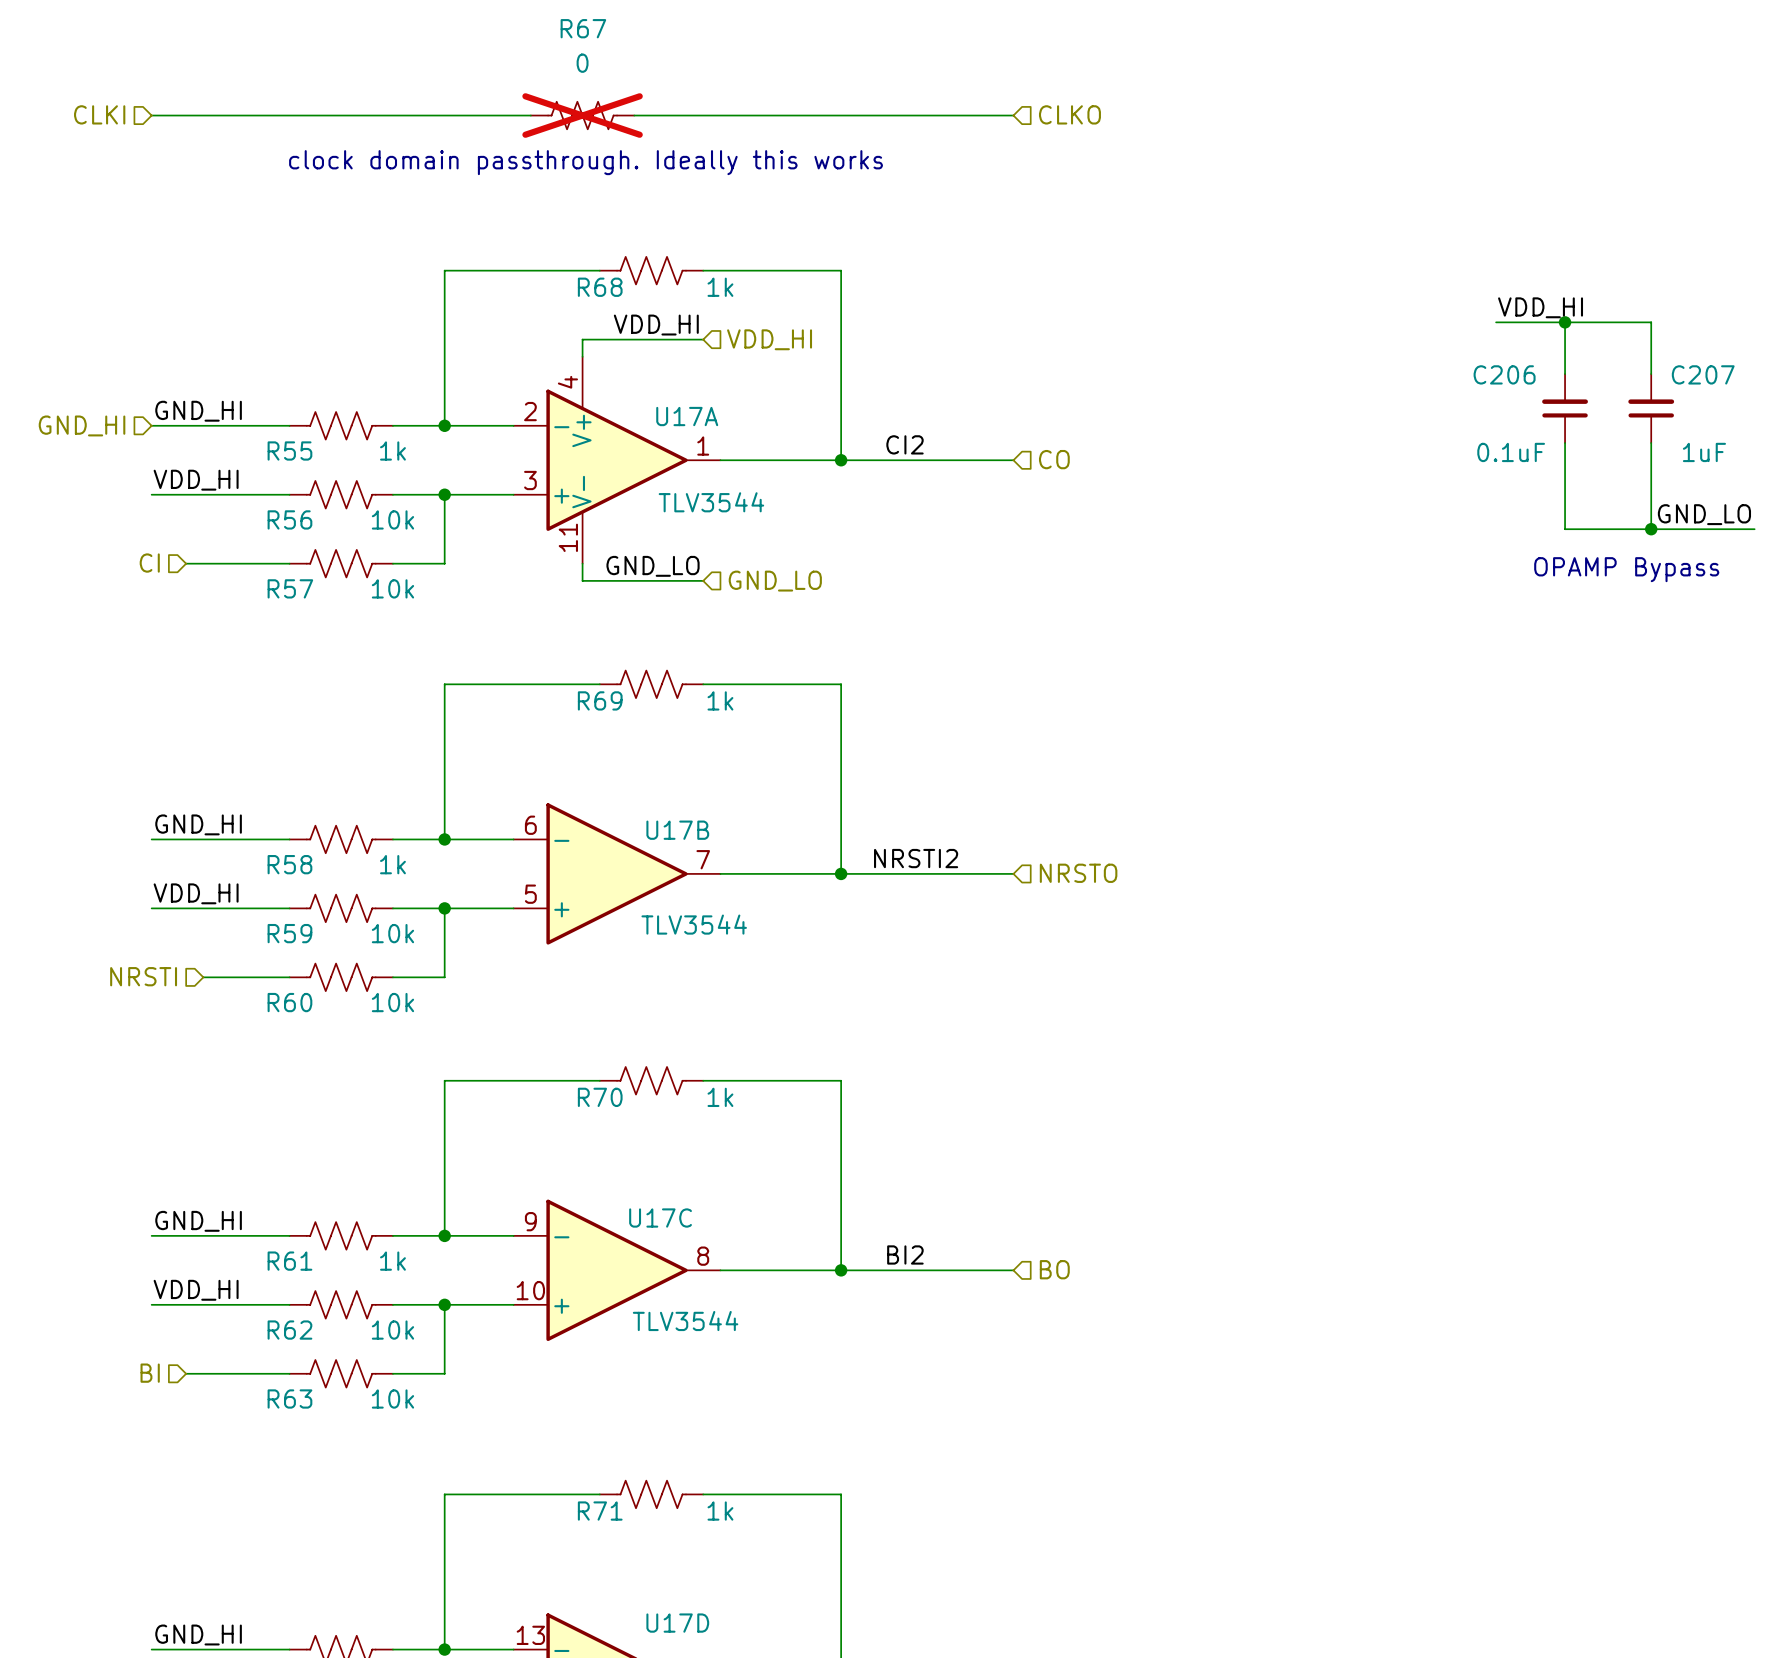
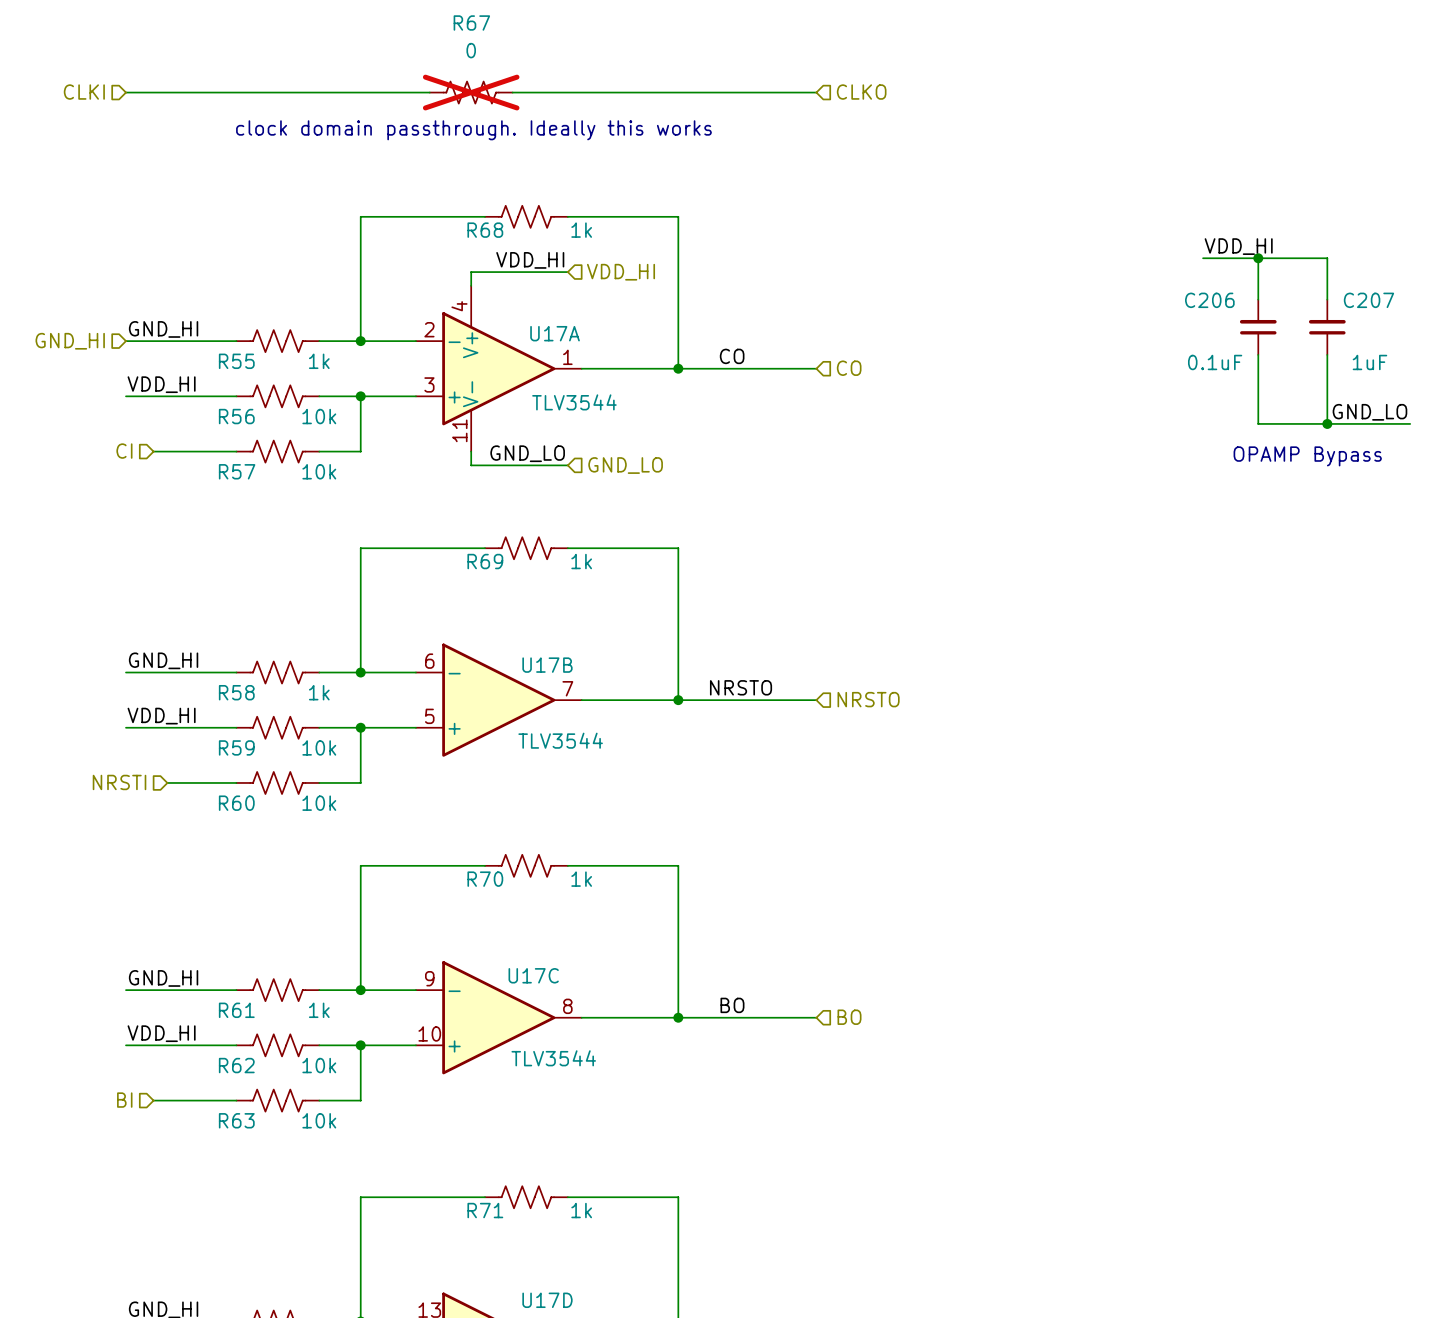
label: CI2 (905, 444) -> CO (732, 356)
label: NRSTI2 (916, 858) -> NRSTO (741, 687)
label: BI2 (905, 1254) -> BO (732, 1005)

